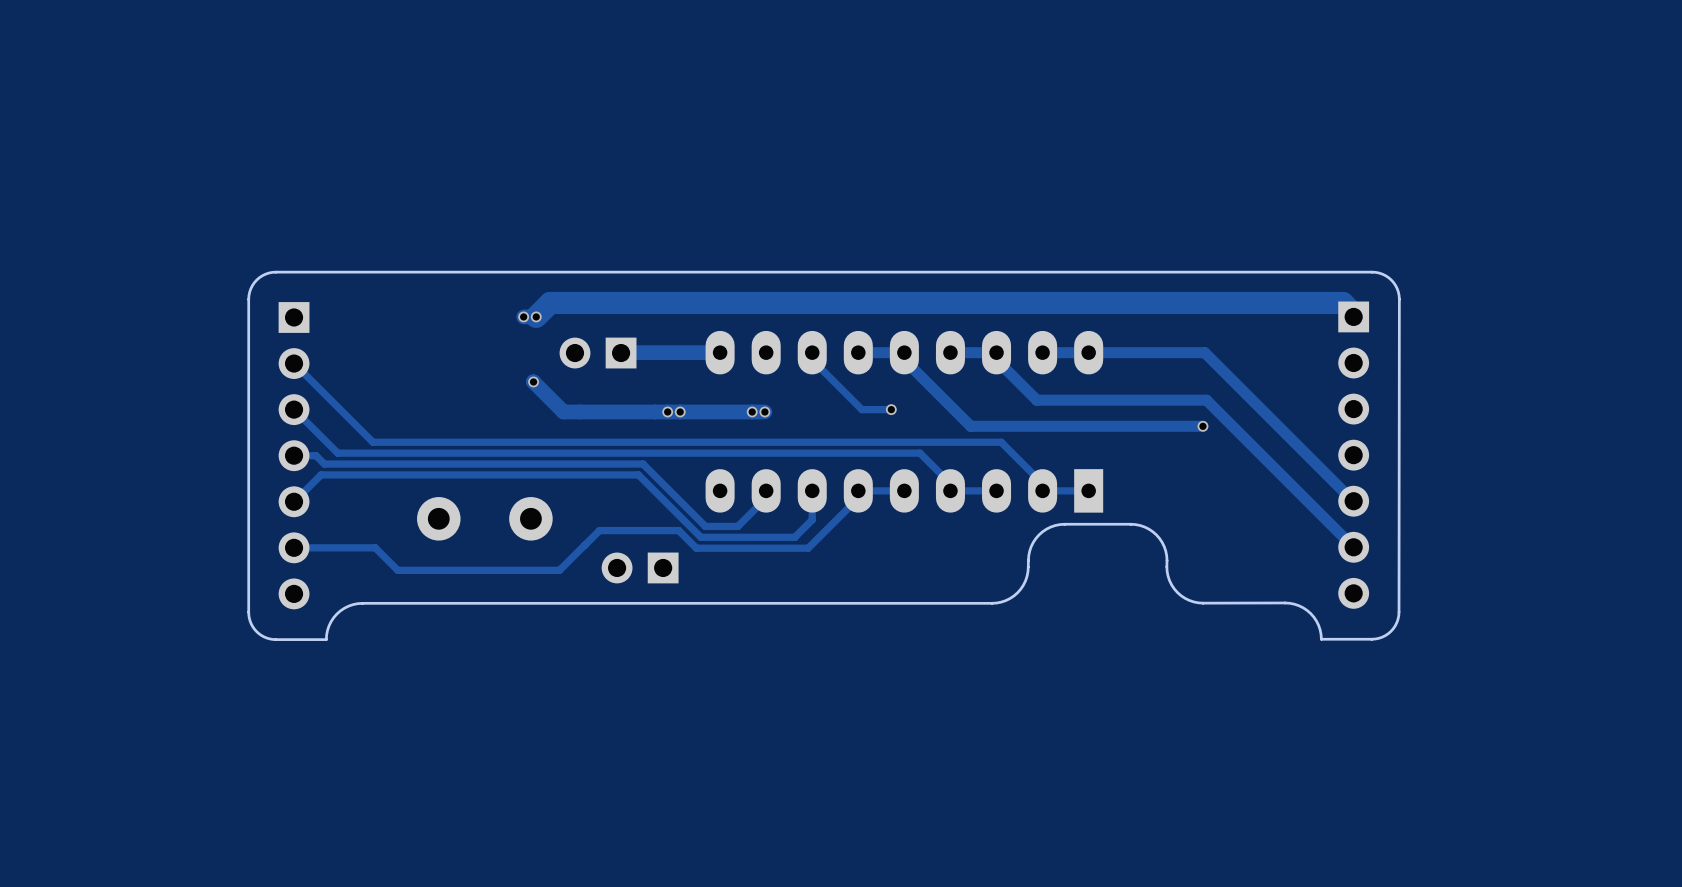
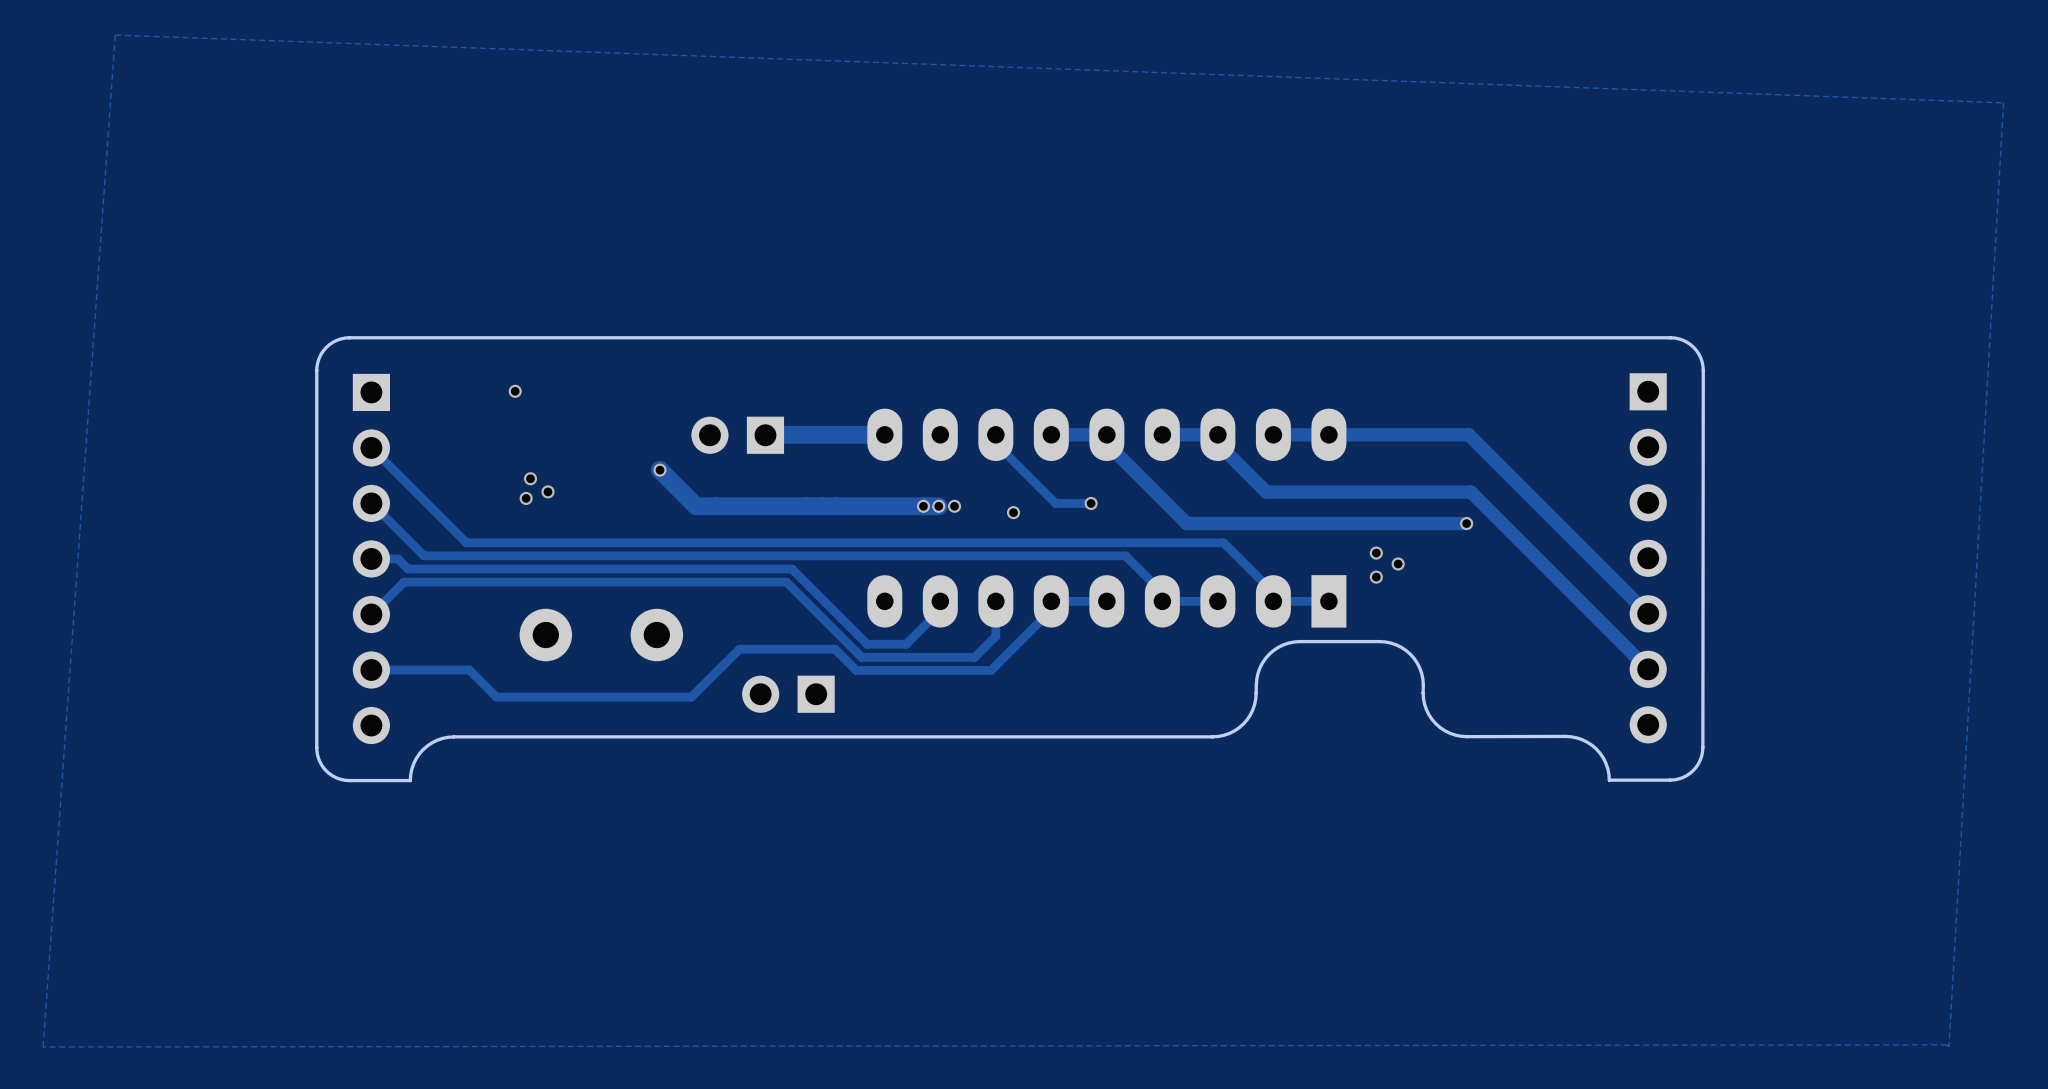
zone outline: none -> (115, 35) (43, 1047) (1946, 1044) (1948, 1047) (2003, 102) (115, 35)
track: (1353, 313) (1342, 302) (550, 302) (536, 316) (523, 316) -> none
via: none -> (515, 391)
via: (523, 316) -> none
via: (536, 316) -> none
via: none -> (530, 478)
via: none -> (548, 491)
via: none -> (526, 498)
via: (667, 411) -> none
via: (680, 411) -> none
via: none -> (954, 506)
via: none -> (1013, 512)
via: none -> (1376, 553)
via: none -> (1398, 563)
via: none -> (1376, 577)

